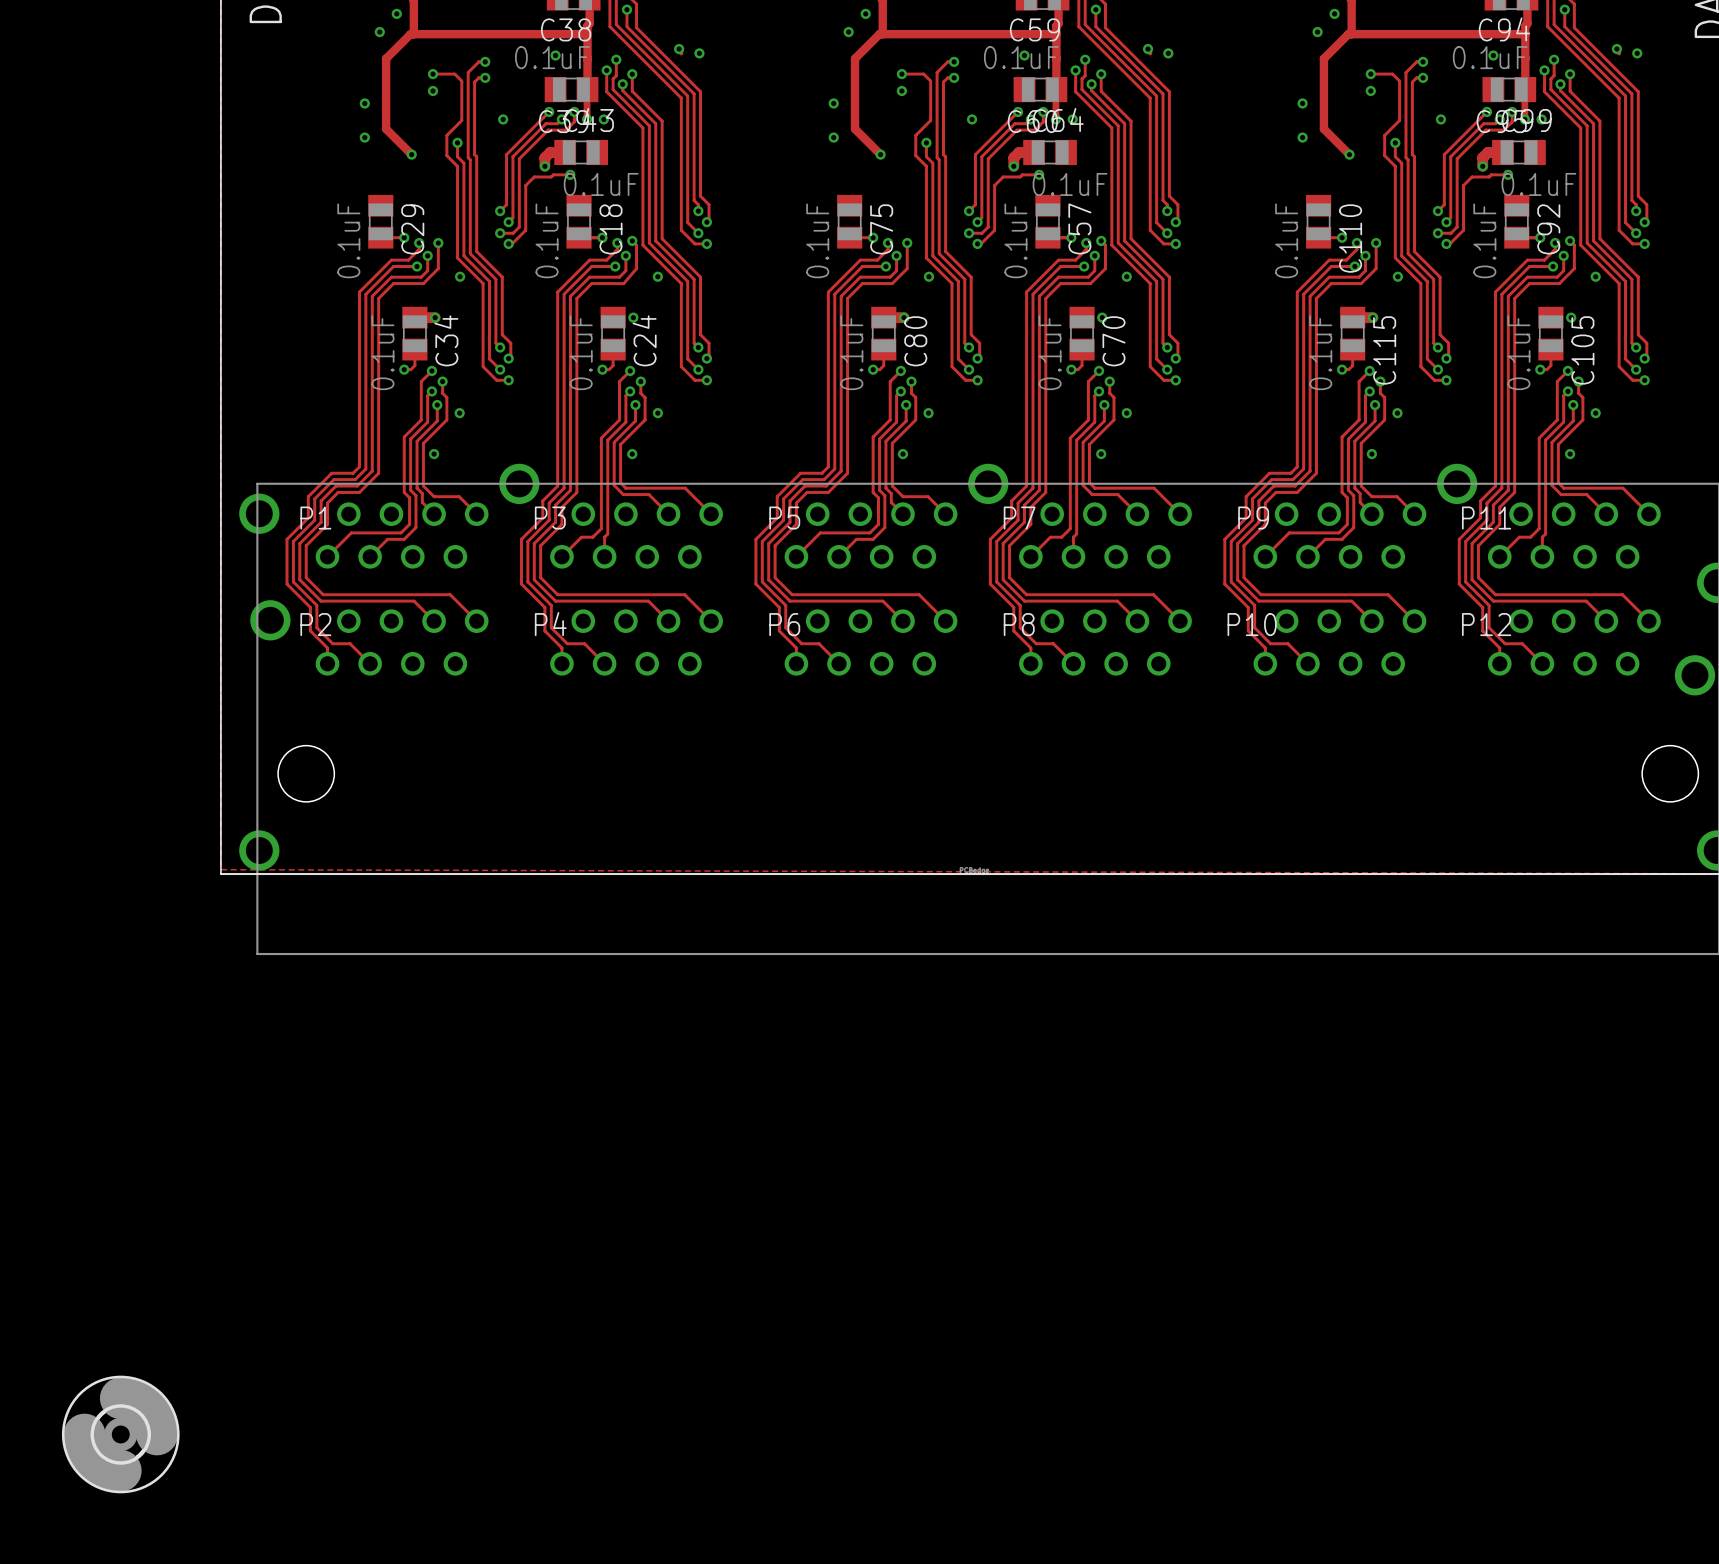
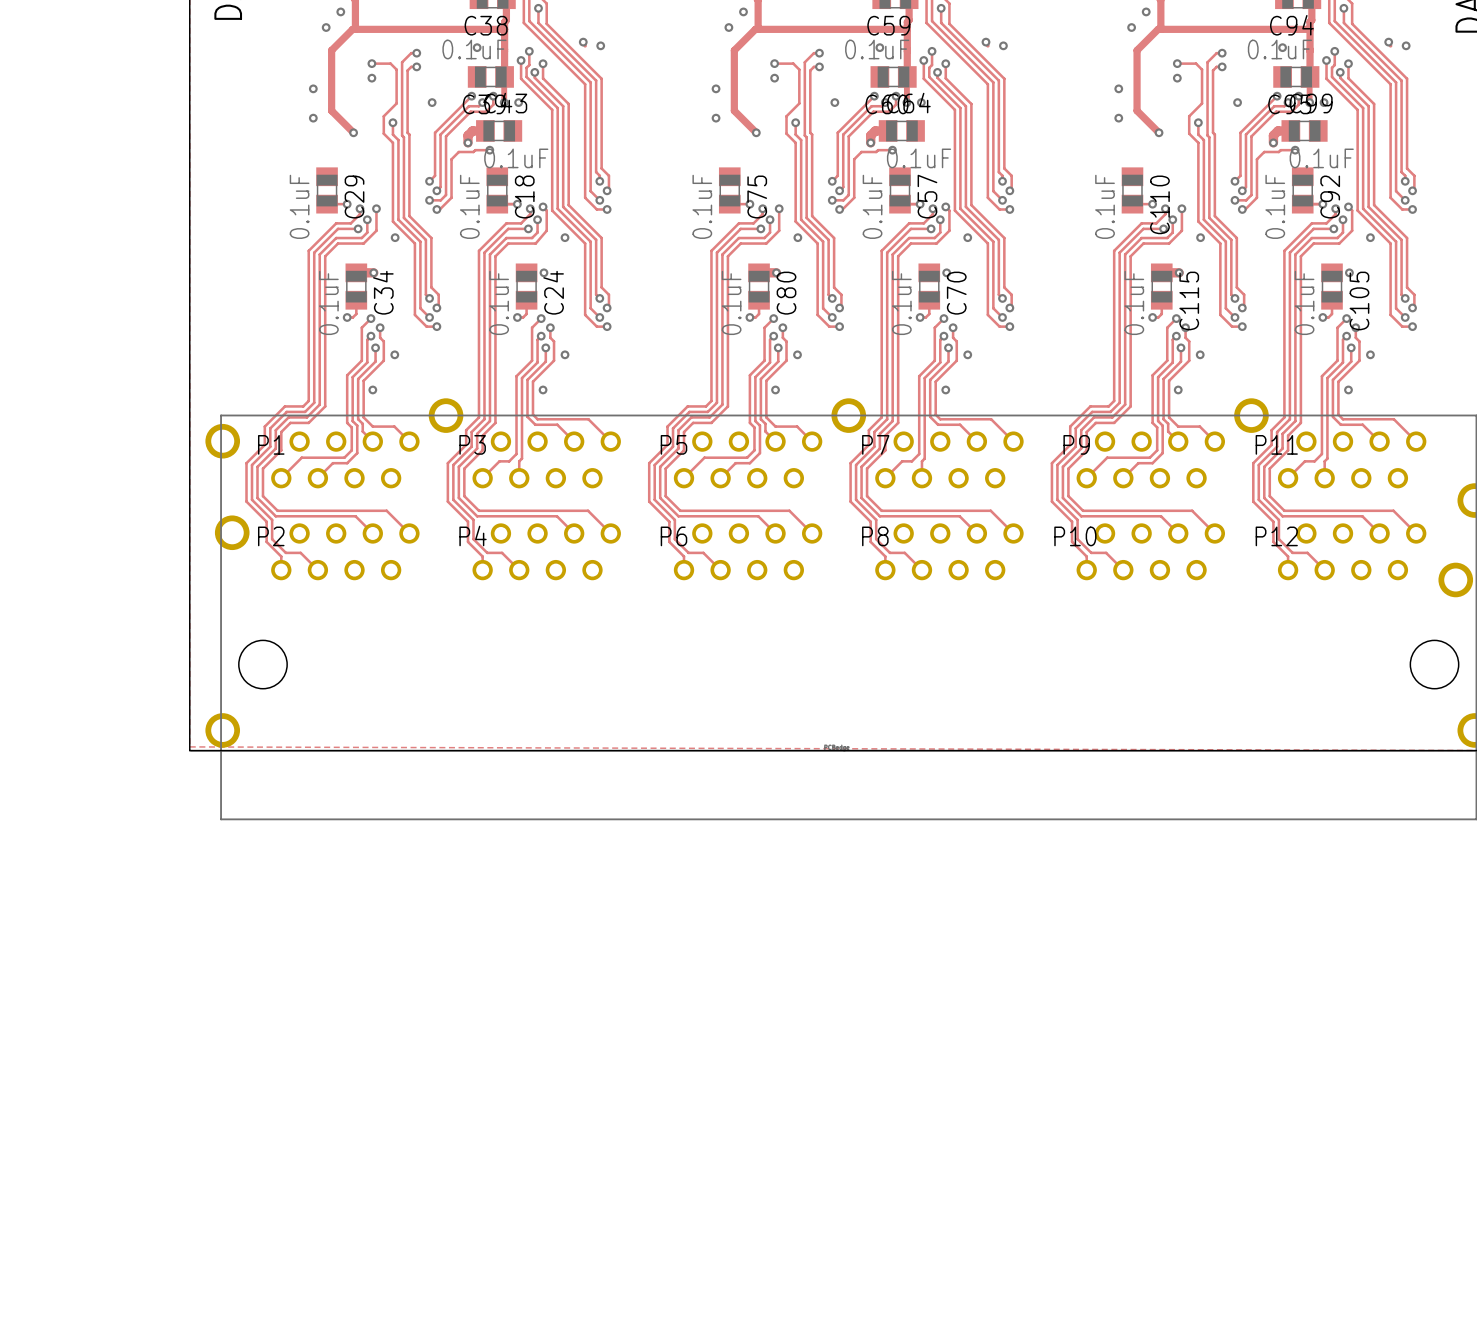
part: (120, 1434) -> none

